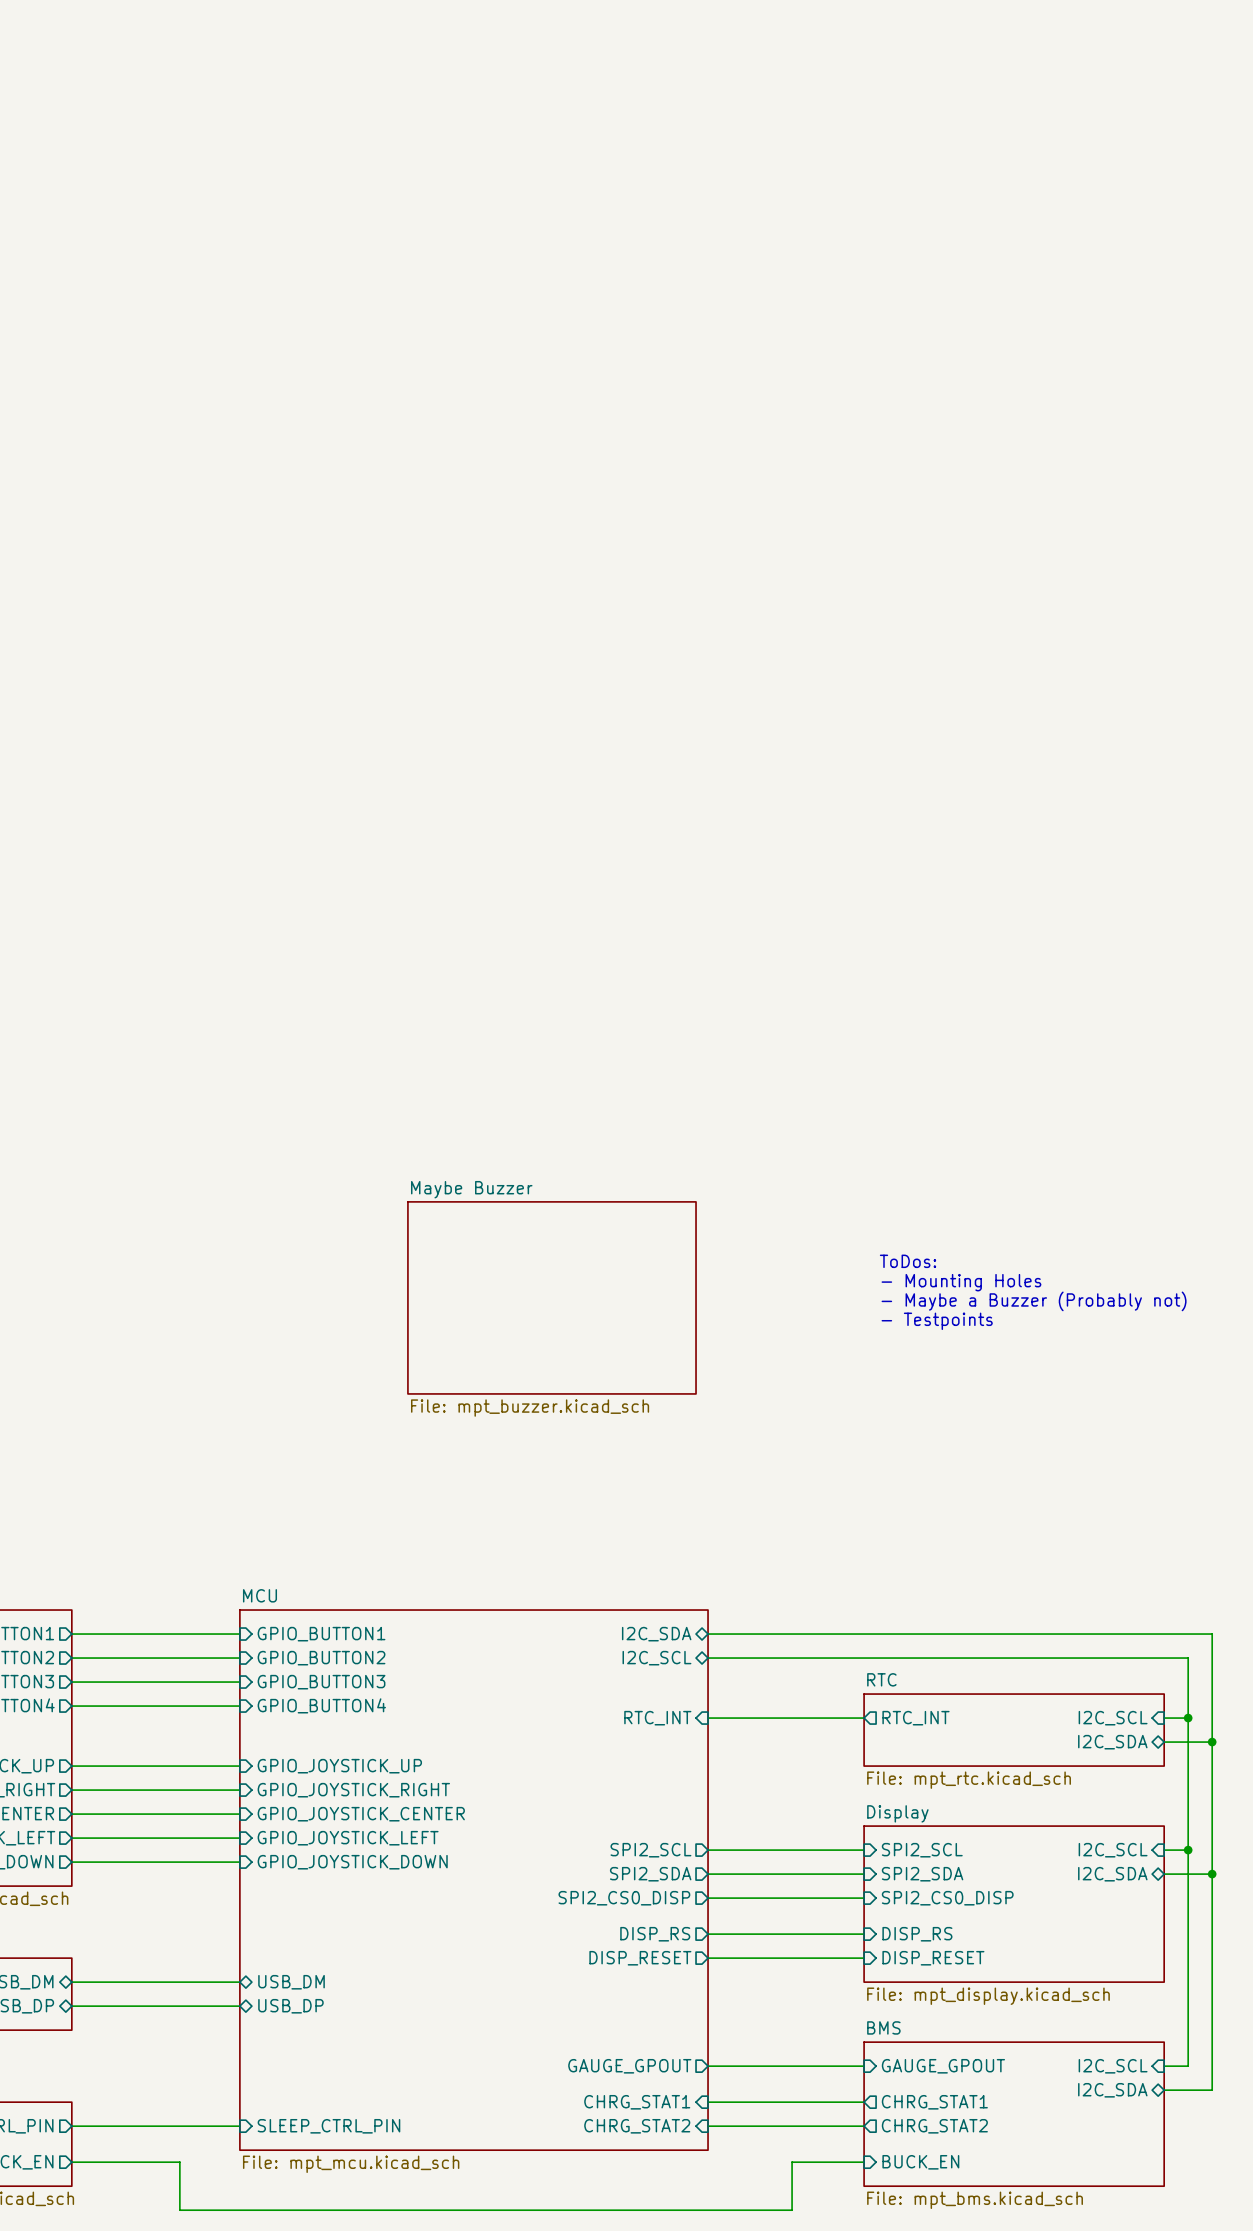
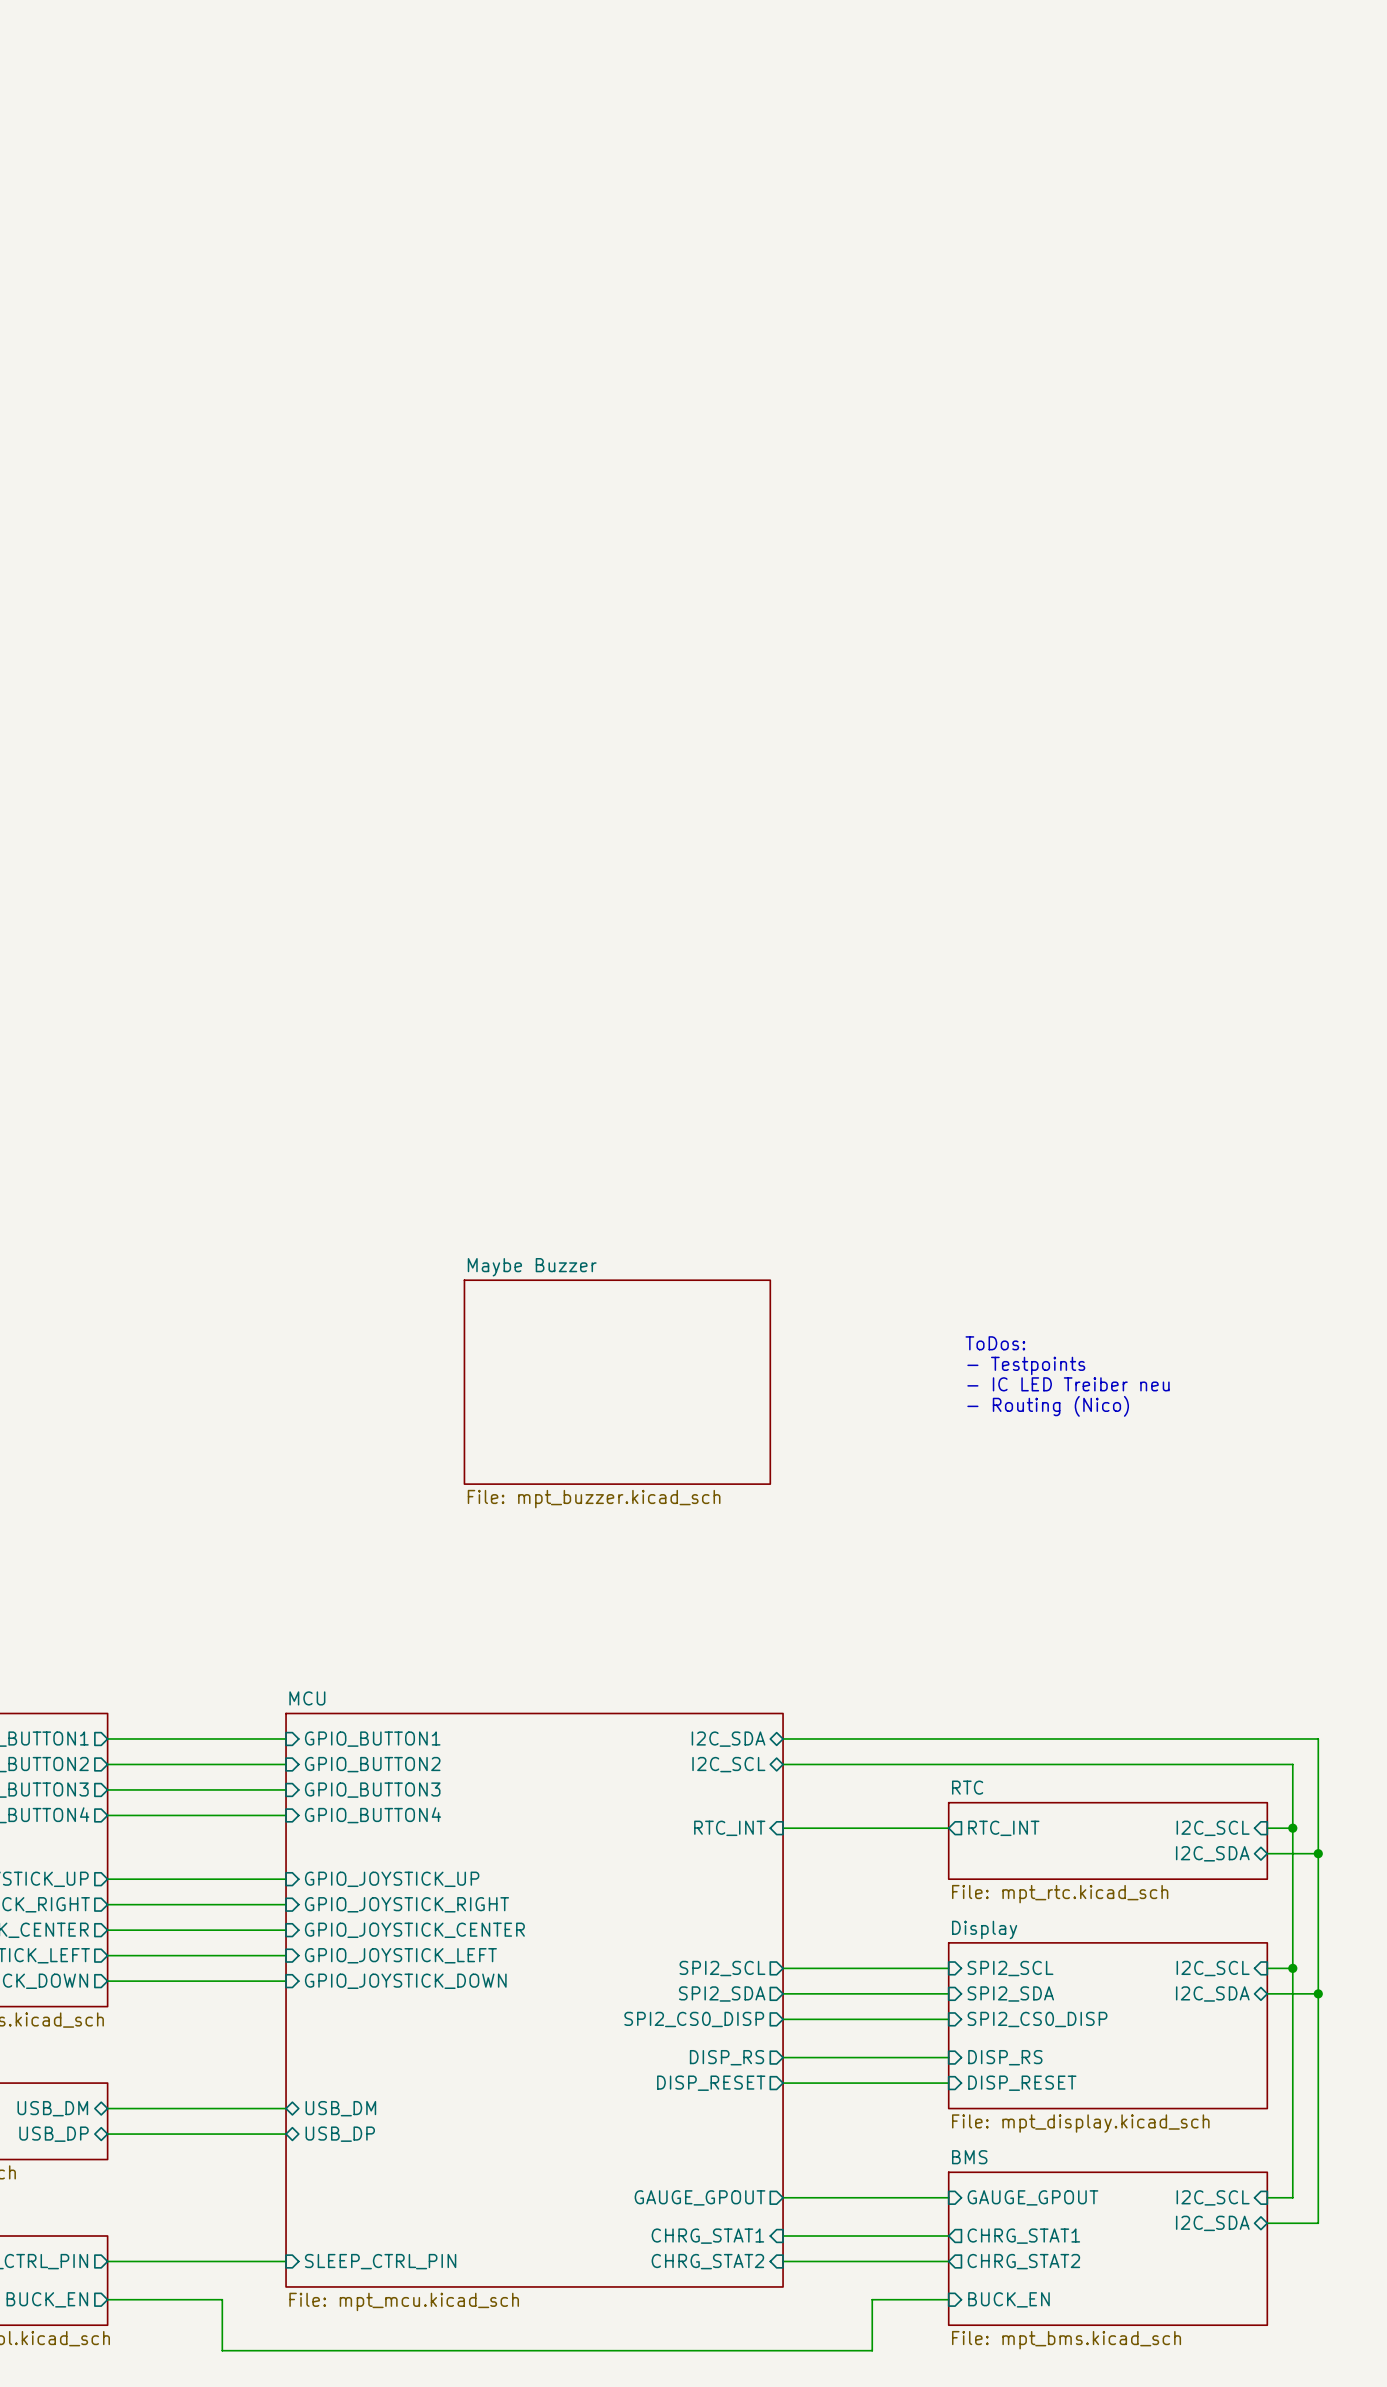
text: - Mounting Holes (961, 1282) -> - Testpoints (1026, 1365)
text: - Maybe a Buzzer (Probably not) (1034, 1301) -> - IC LED Treiber neu (1068, 1384)
text: - Testpoints (937, 1321) -> - Routing (Nico) (1048, 1406)

